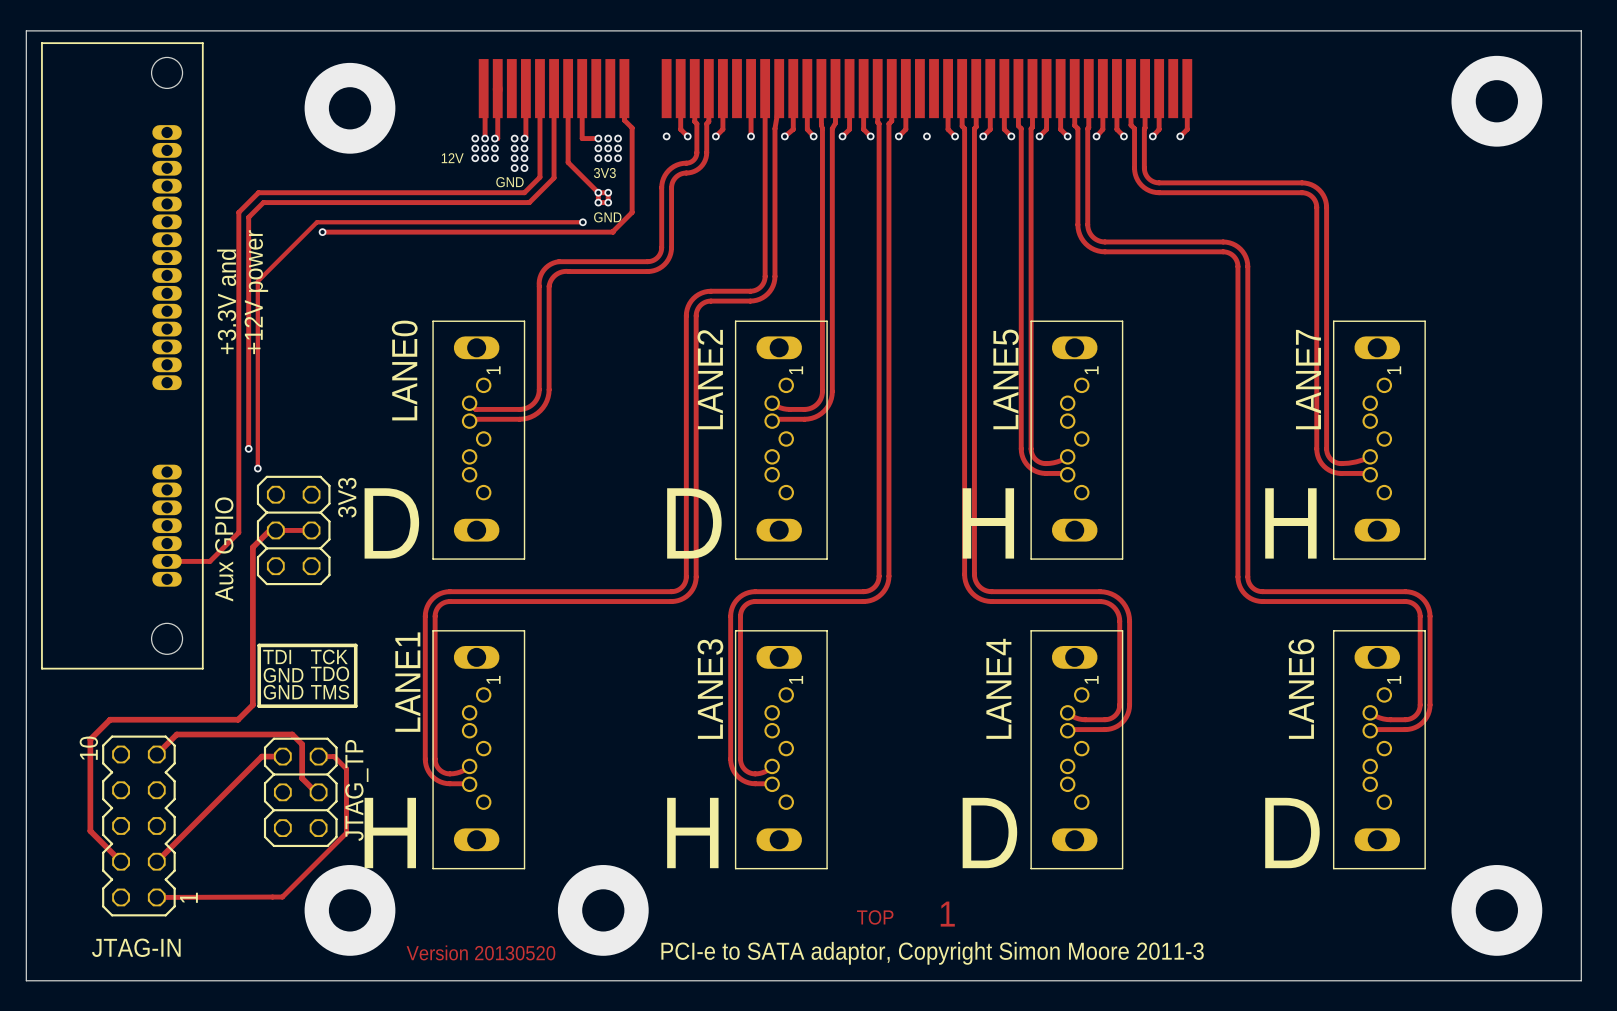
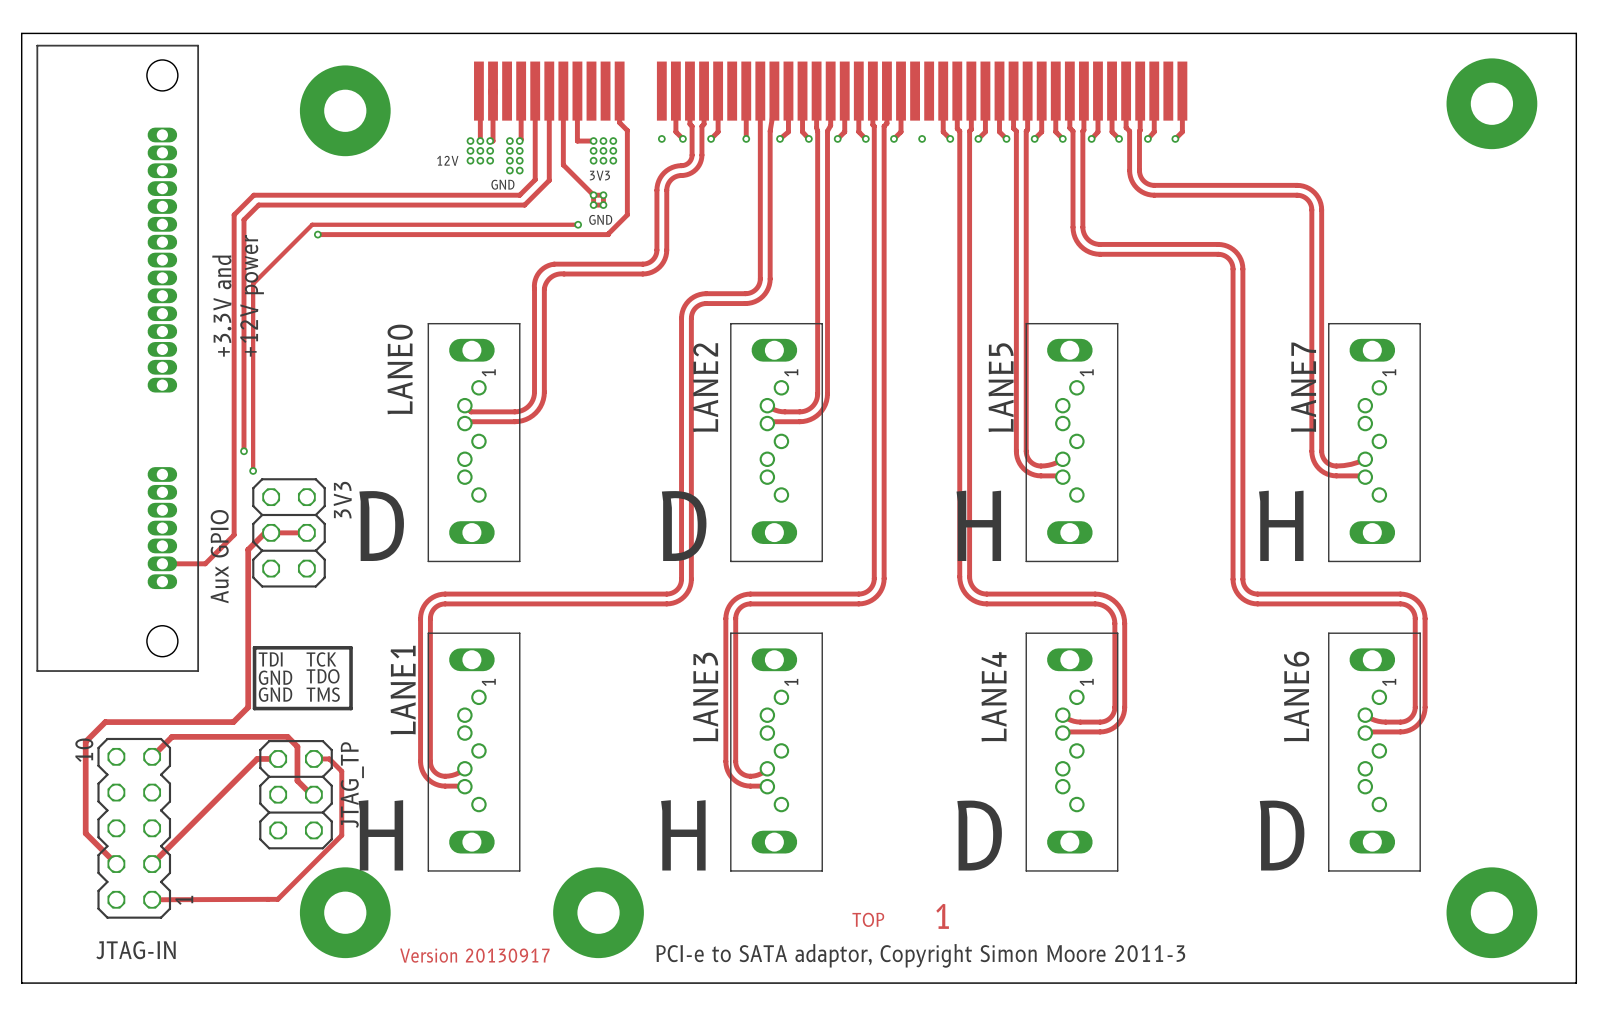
text: Version 20130520 (480, 952) -> Version 20130917 (474, 955)

